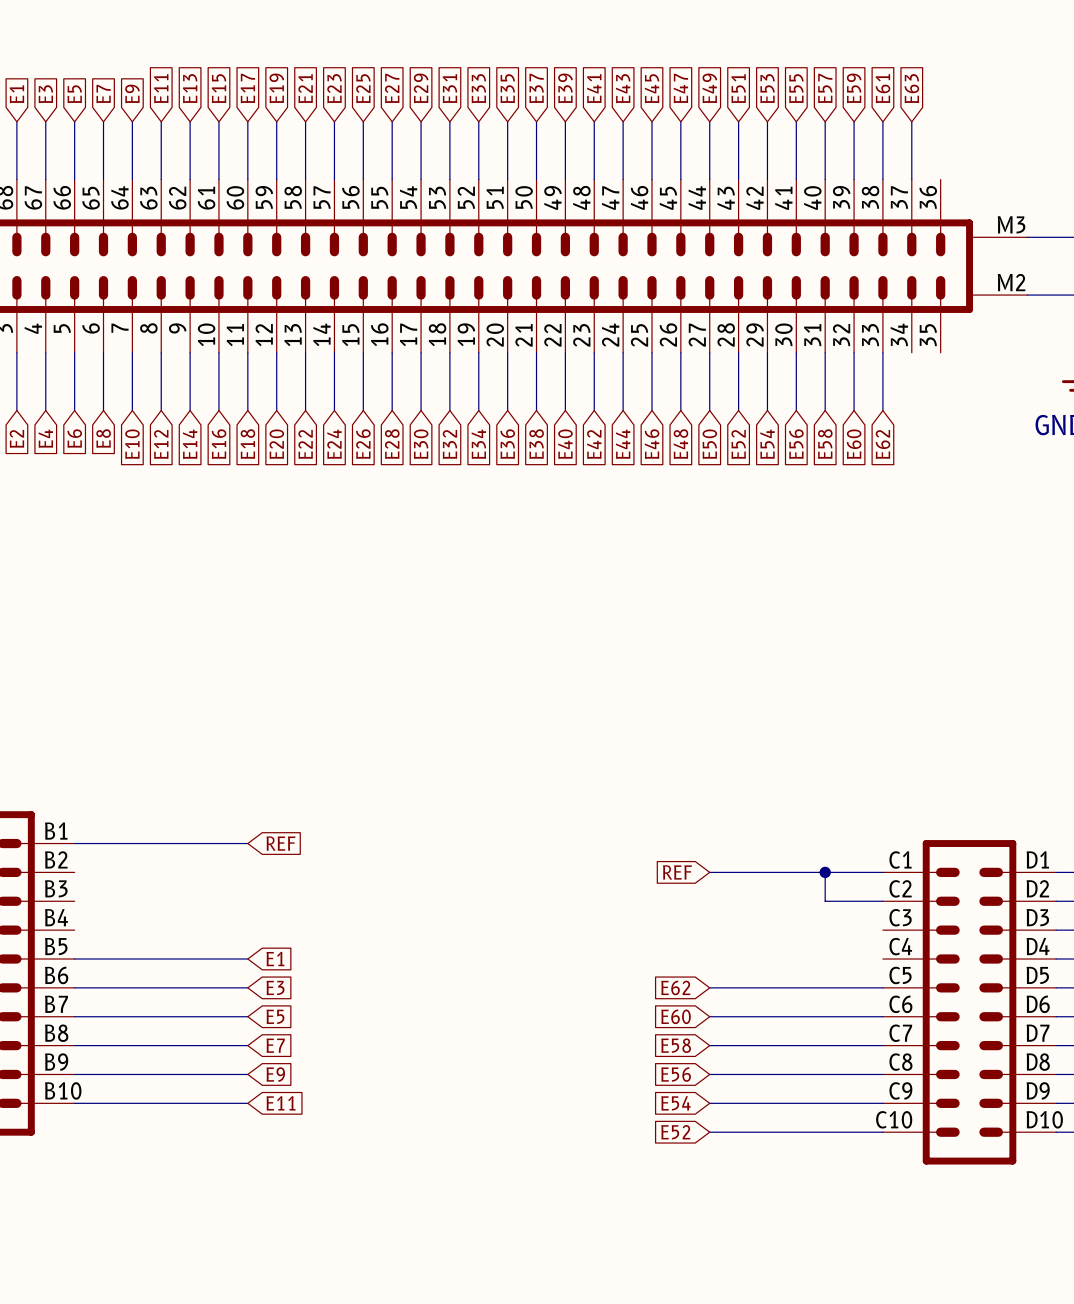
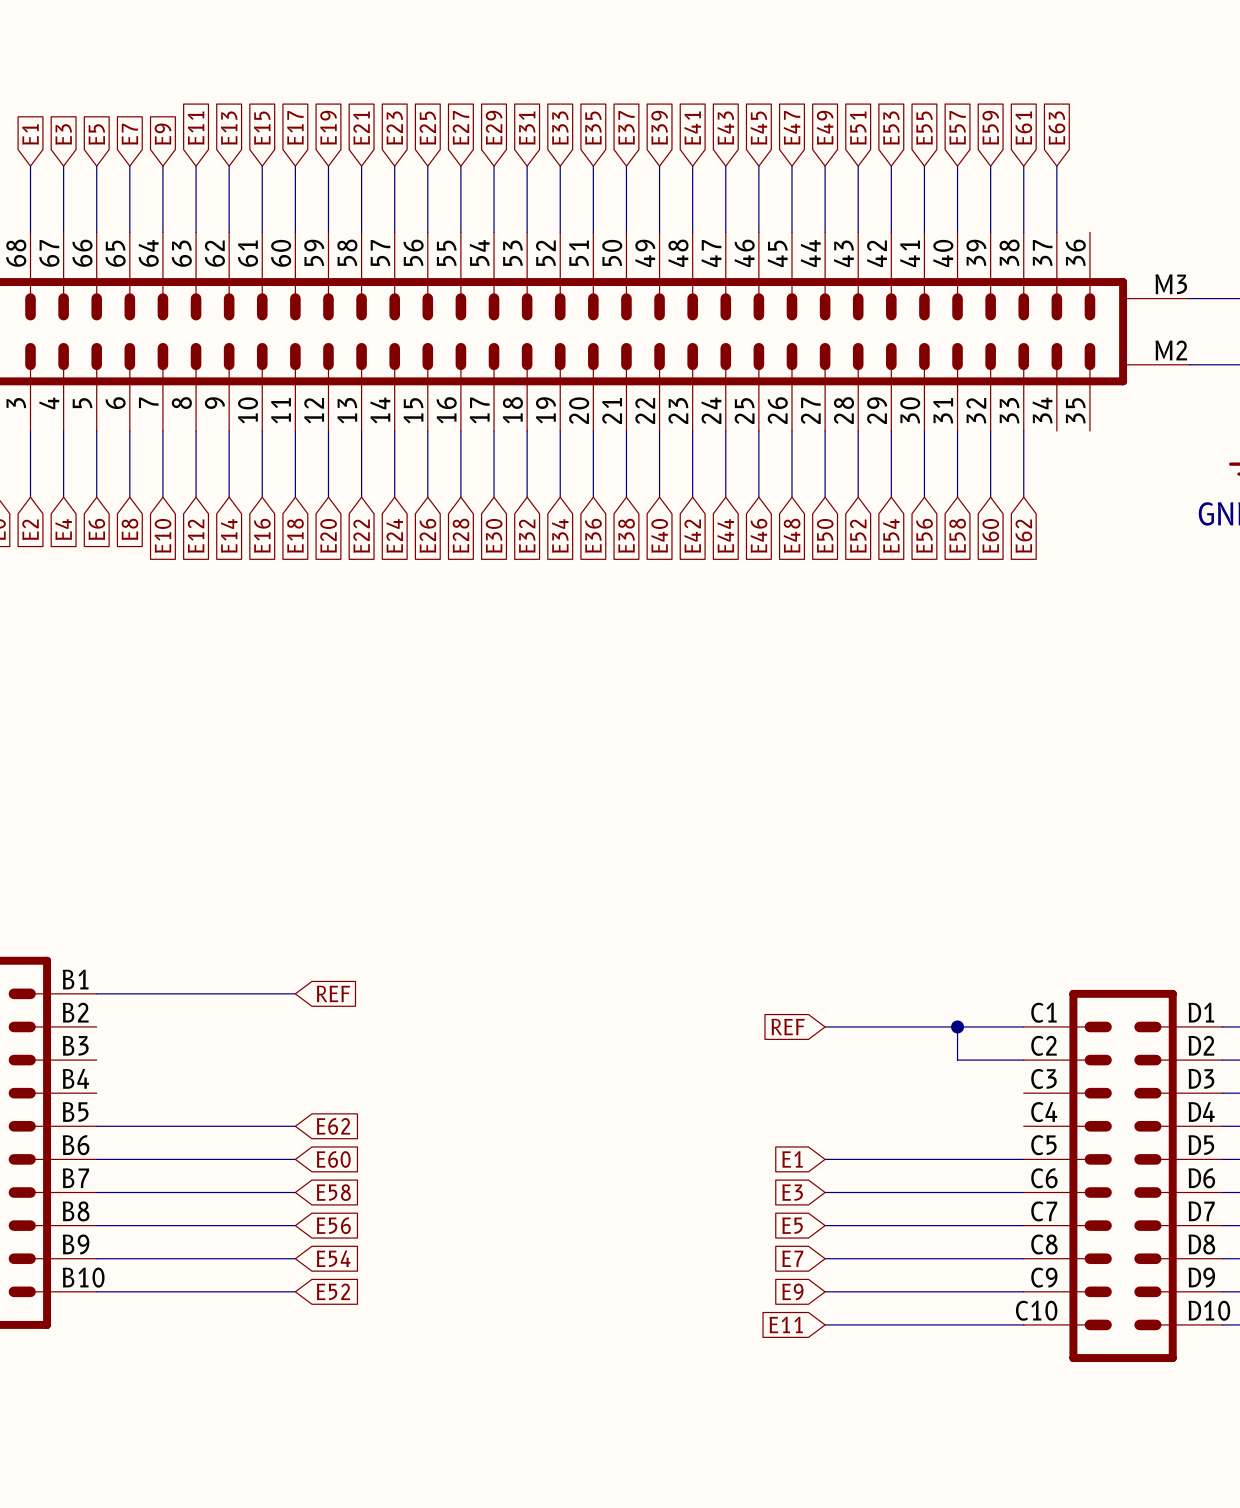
global label: E1 (275, 959) -> E62 (333, 1126)
global label: E3 (275, 987) -> E60 (333, 1159)
global label: E62 (675, 987) -> E1 (792, 1159)
global label: E5 (275, 1016) -> E58 (333, 1192)
global label: E60 (676, 1016) -> E3 (792, 1192)
global label: E7 (275, 1045) -> E56 (333, 1225)
global label: E58 (676, 1045) -> E5 (792, 1225)
global label: E9 (275, 1074) -> E54 (333, 1258)
global label: E56 (676, 1074) -> E7 (792, 1258)
global label: E11 (281, 1103) -> E52 (333, 1291)
global label: E54 (675, 1103) -> E9 (792, 1291)
global label: E52 (675, 1132) -> E11 (786, 1324)

